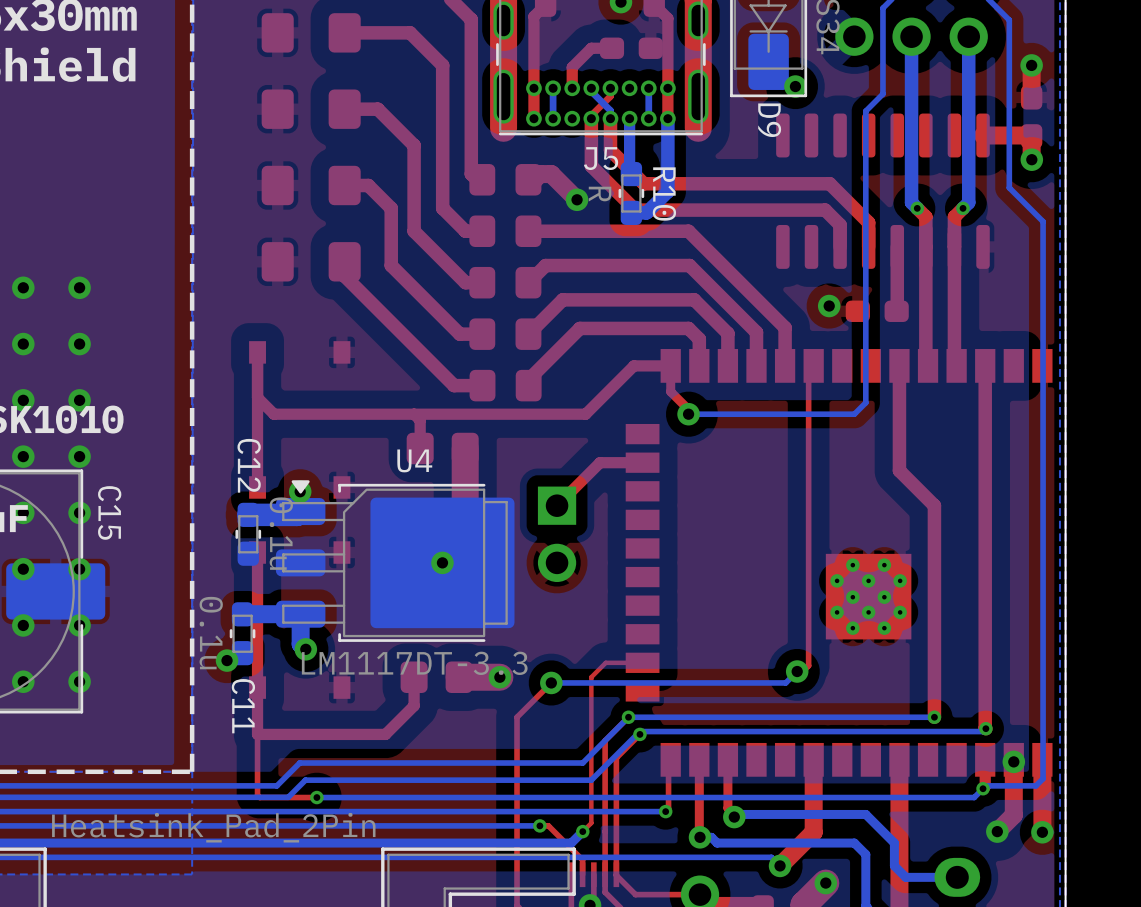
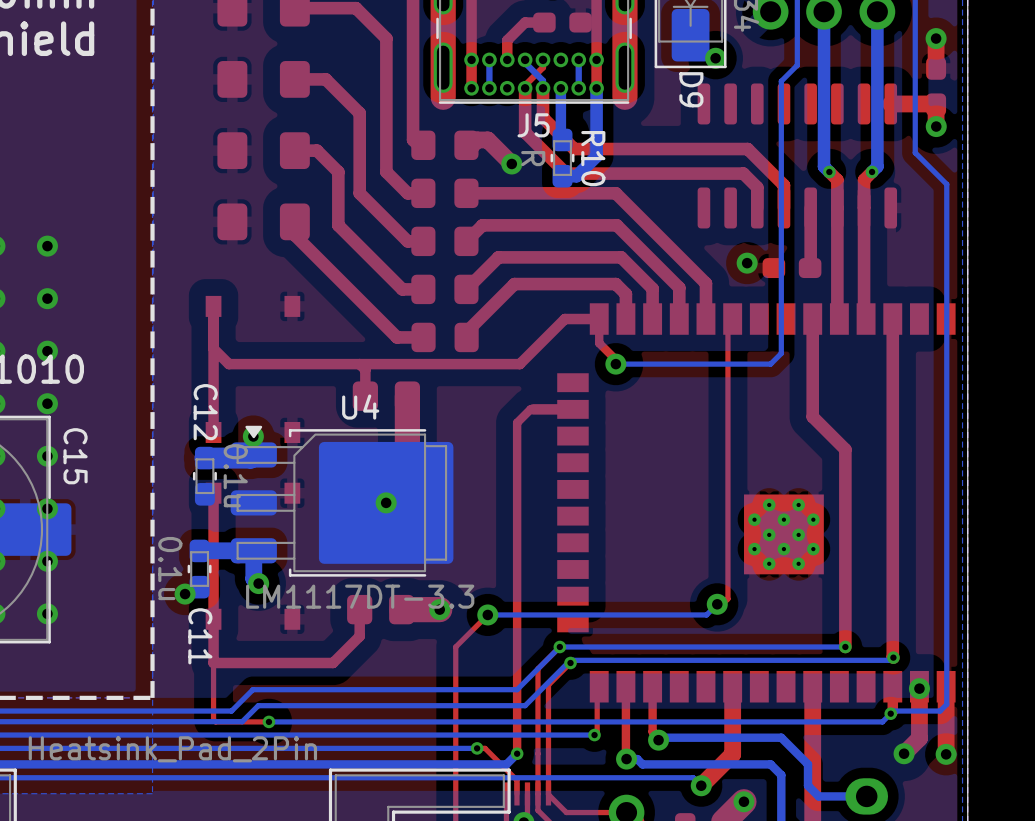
top track: (600, 462) (557, 505) -> none
part: (557, 534) -> none
top track: (642, 662) (605, 662) (591, 677) (591, 823) (582, 831) -> (533, 409) (530, 409) (517, 422) (517, 753)

